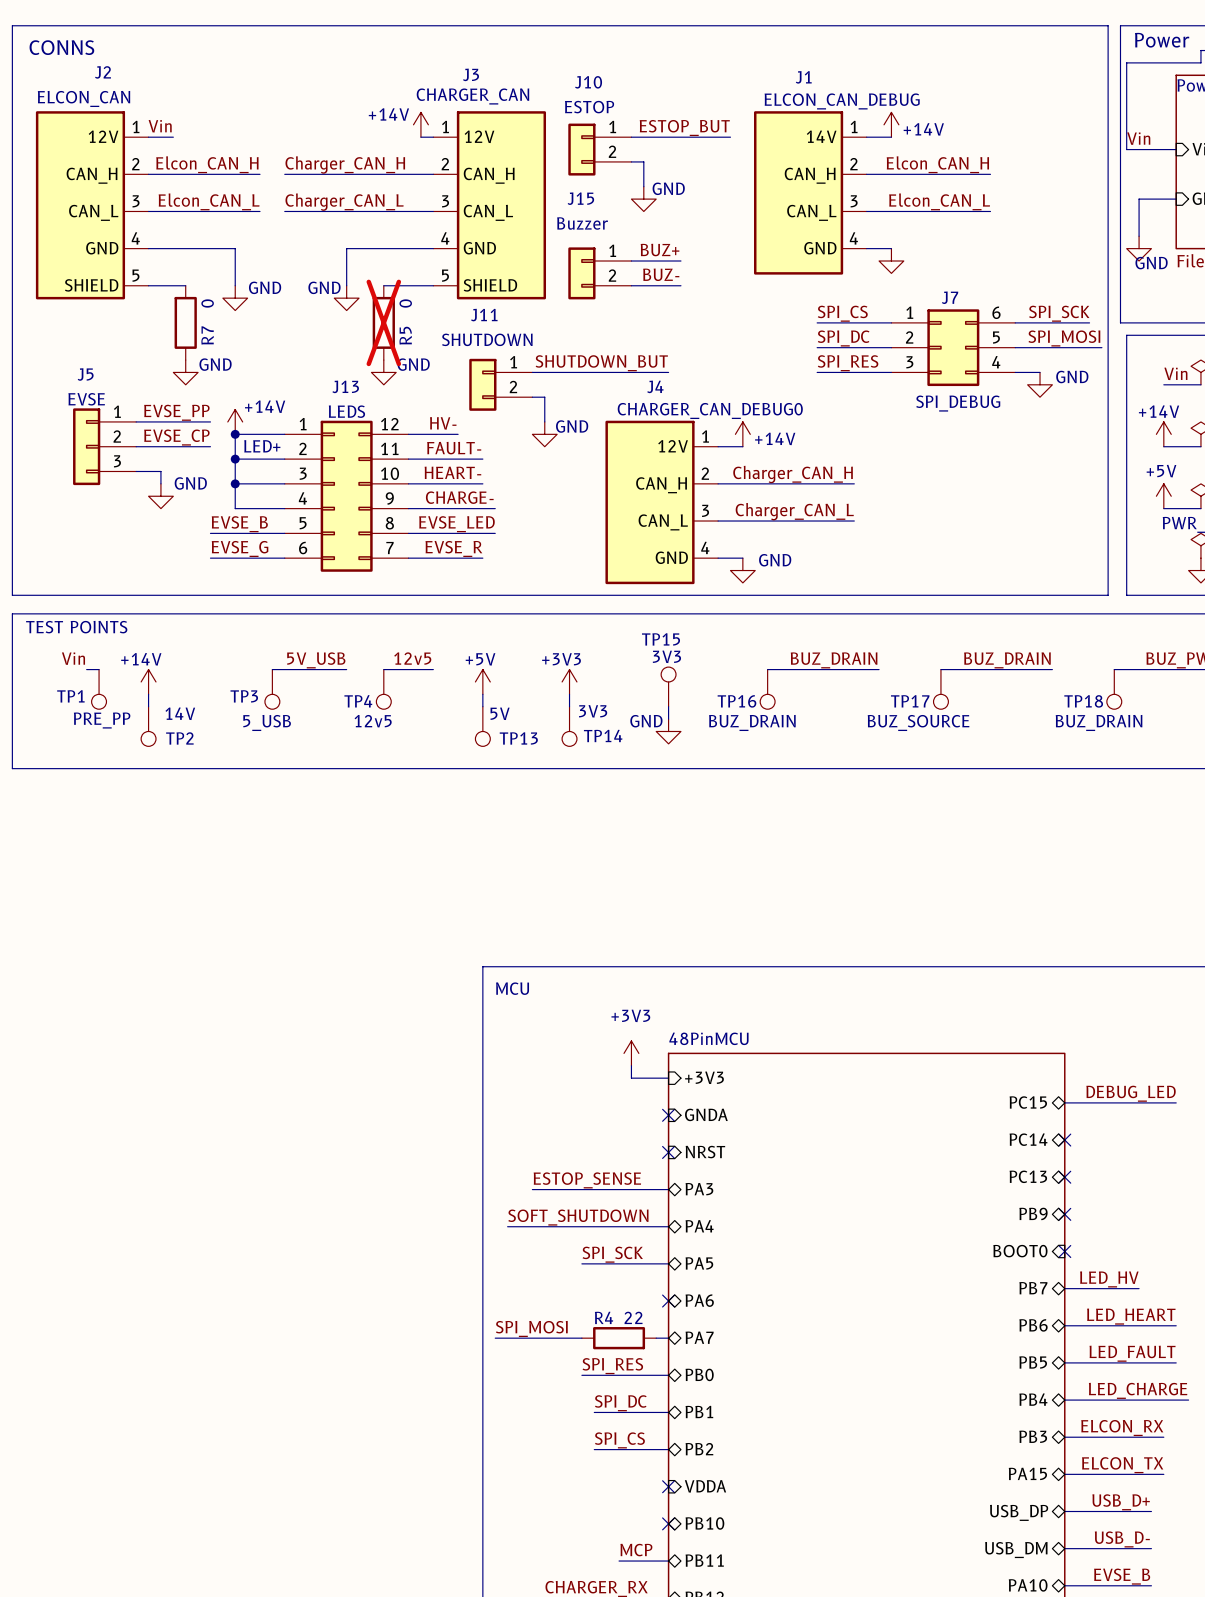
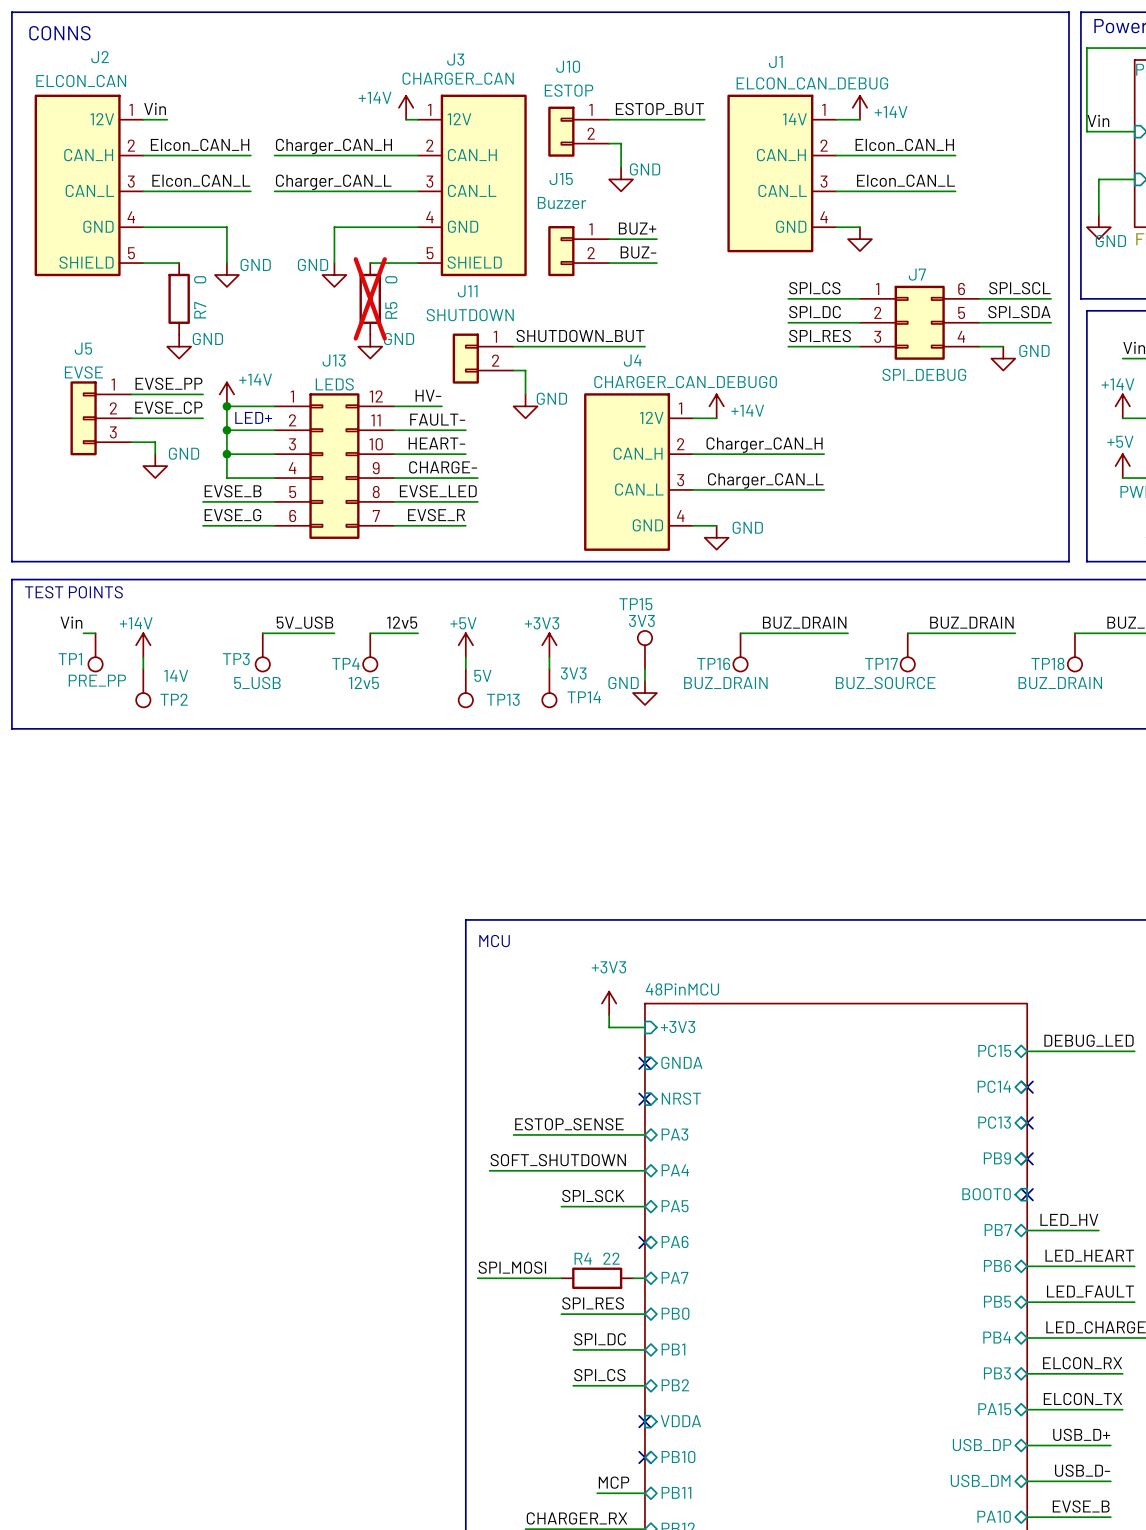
label: SPI_SCK (1059, 313) -> SPI_SCL (1019, 288)
label: SPI_MOSI (1064, 338) -> SPI_SDA (1019, 312)
wire: (1089, 347) (1101, 347) -> none

